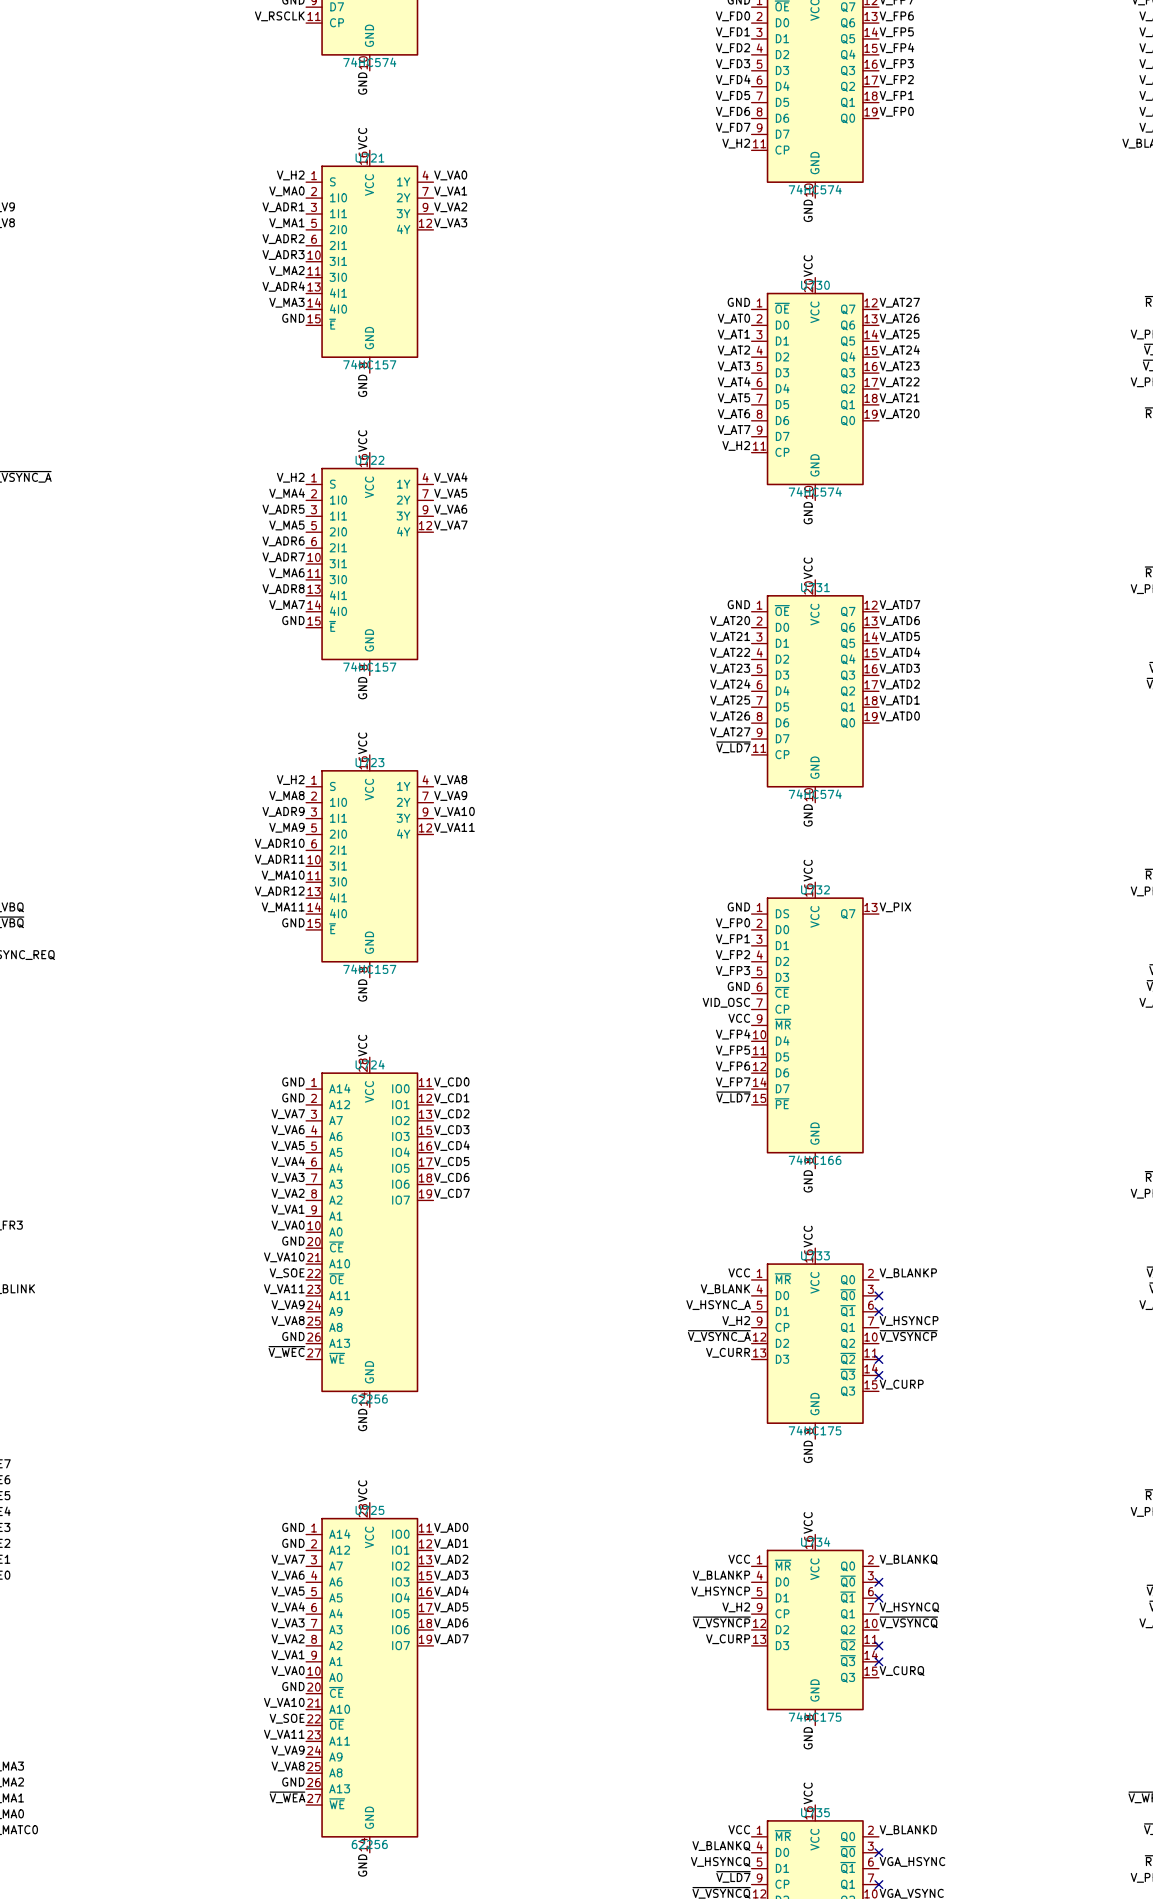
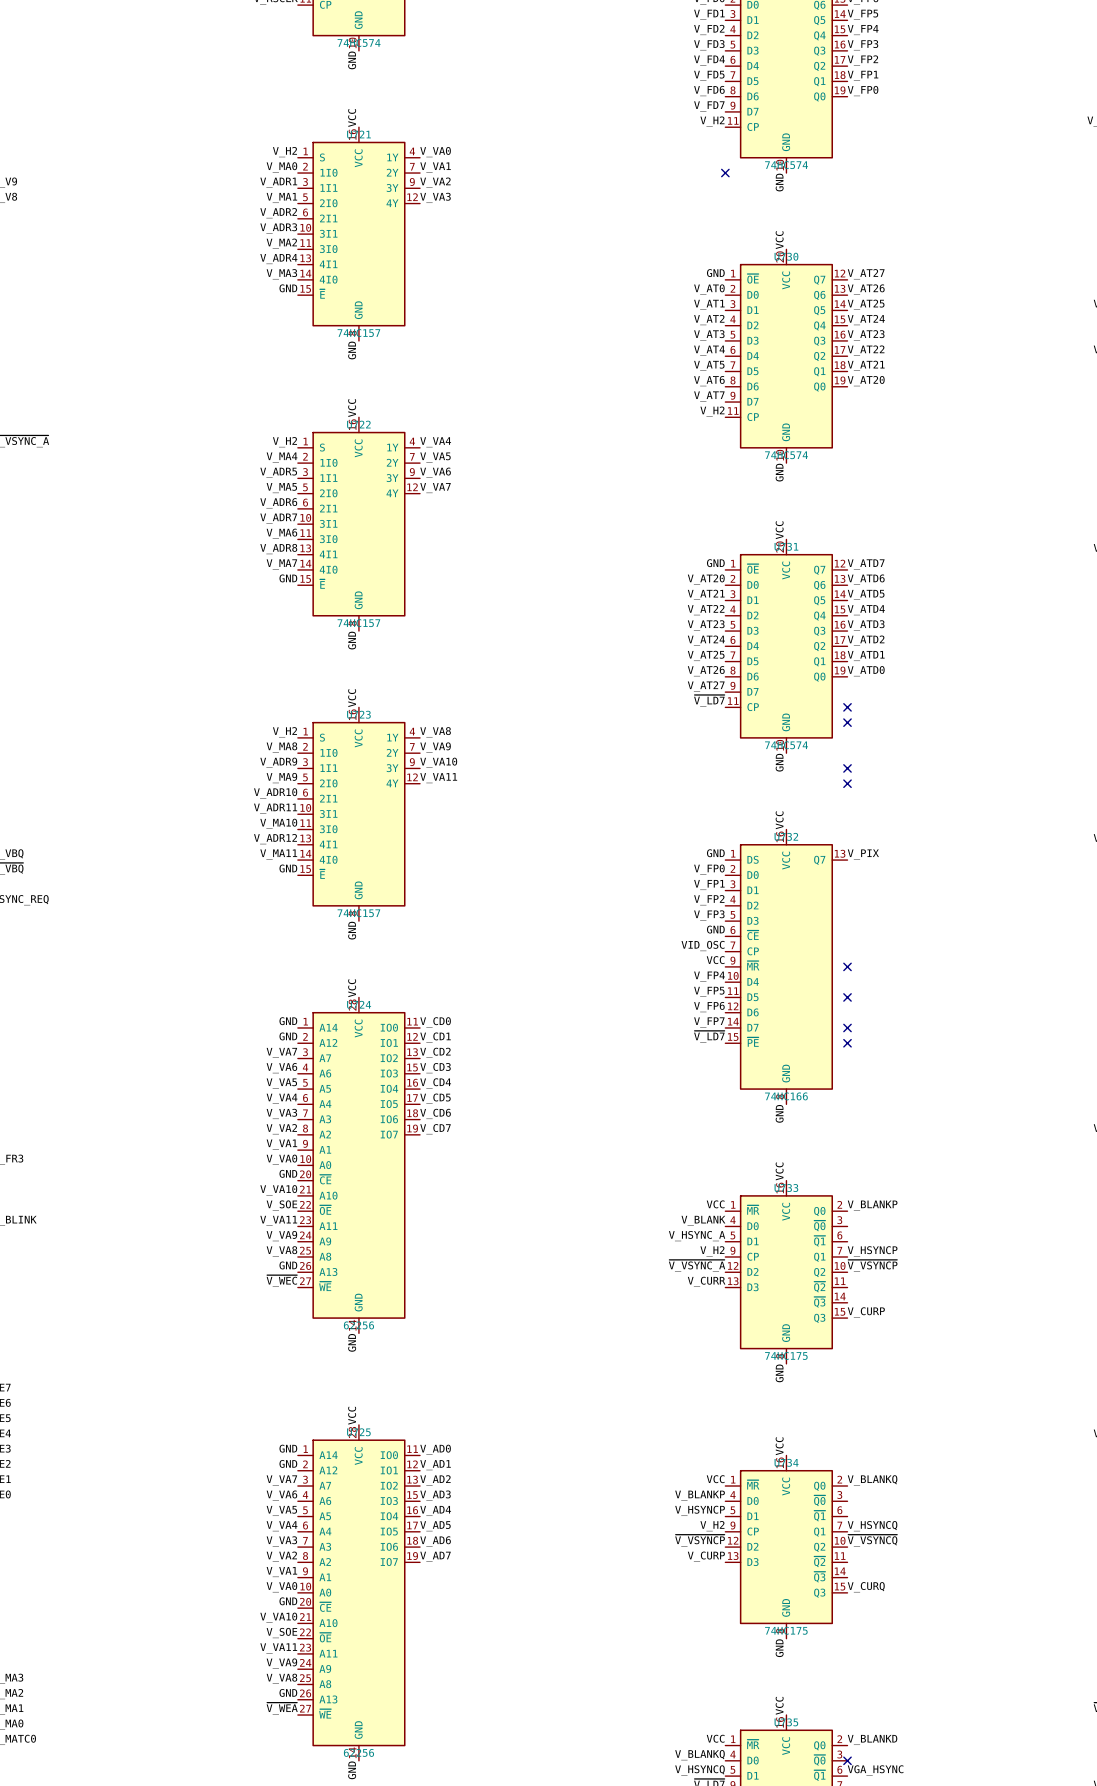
no-connect mark: none -> (725, 173)
no-connect mark: none -> (847, 707)
no-connect mark: none -> (847, 722)
no-connect mark: none -> (847, 768)
no-connect mark: none -> (847, 783)
no-connect mark: none -> (847, 966)
no-connect mark: none -> (847, 997)
no-connect mark: none -> (847, 1027)
no-connect mark: none -> (847, 1043)
no-connect mark: (878, 1295) -> none
no-connect mark: (878, 1311) -> none
no-connect mark: (878, 1359) -> none
no-connect mark: (878, 1375) -> none
no-connect mark: (878, 1582) -> none
no-connect mark: (878, 1598) -> none
no-connect mark: (878, 1645) -> none
no-connect mark: (878, 1661) -> none

